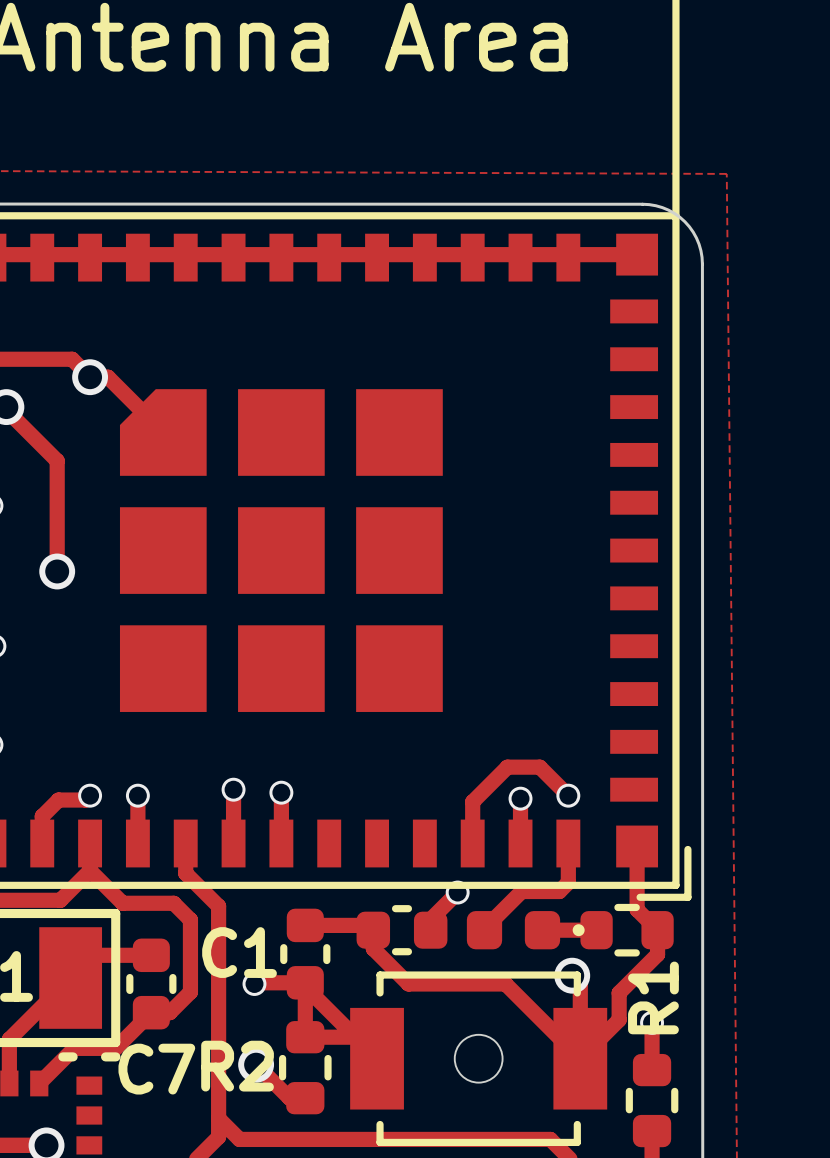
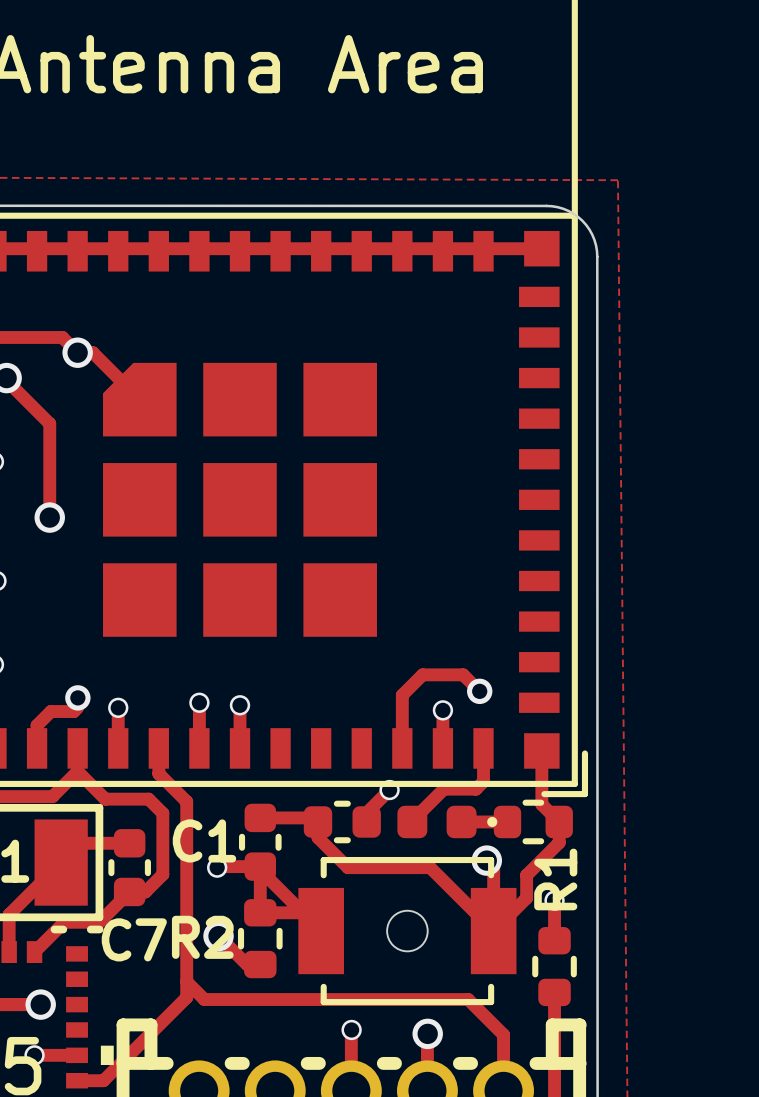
via size: [78, 783, 103, 808] -> [65, 685, 91, 711]
track: (568, 795) (539, 767) (507, 767) (472, 801) -> (479, 691) (463, 674) (422, 674) (402, 695) (402, 713)
via position: (568, 795) -> (479, 691)

